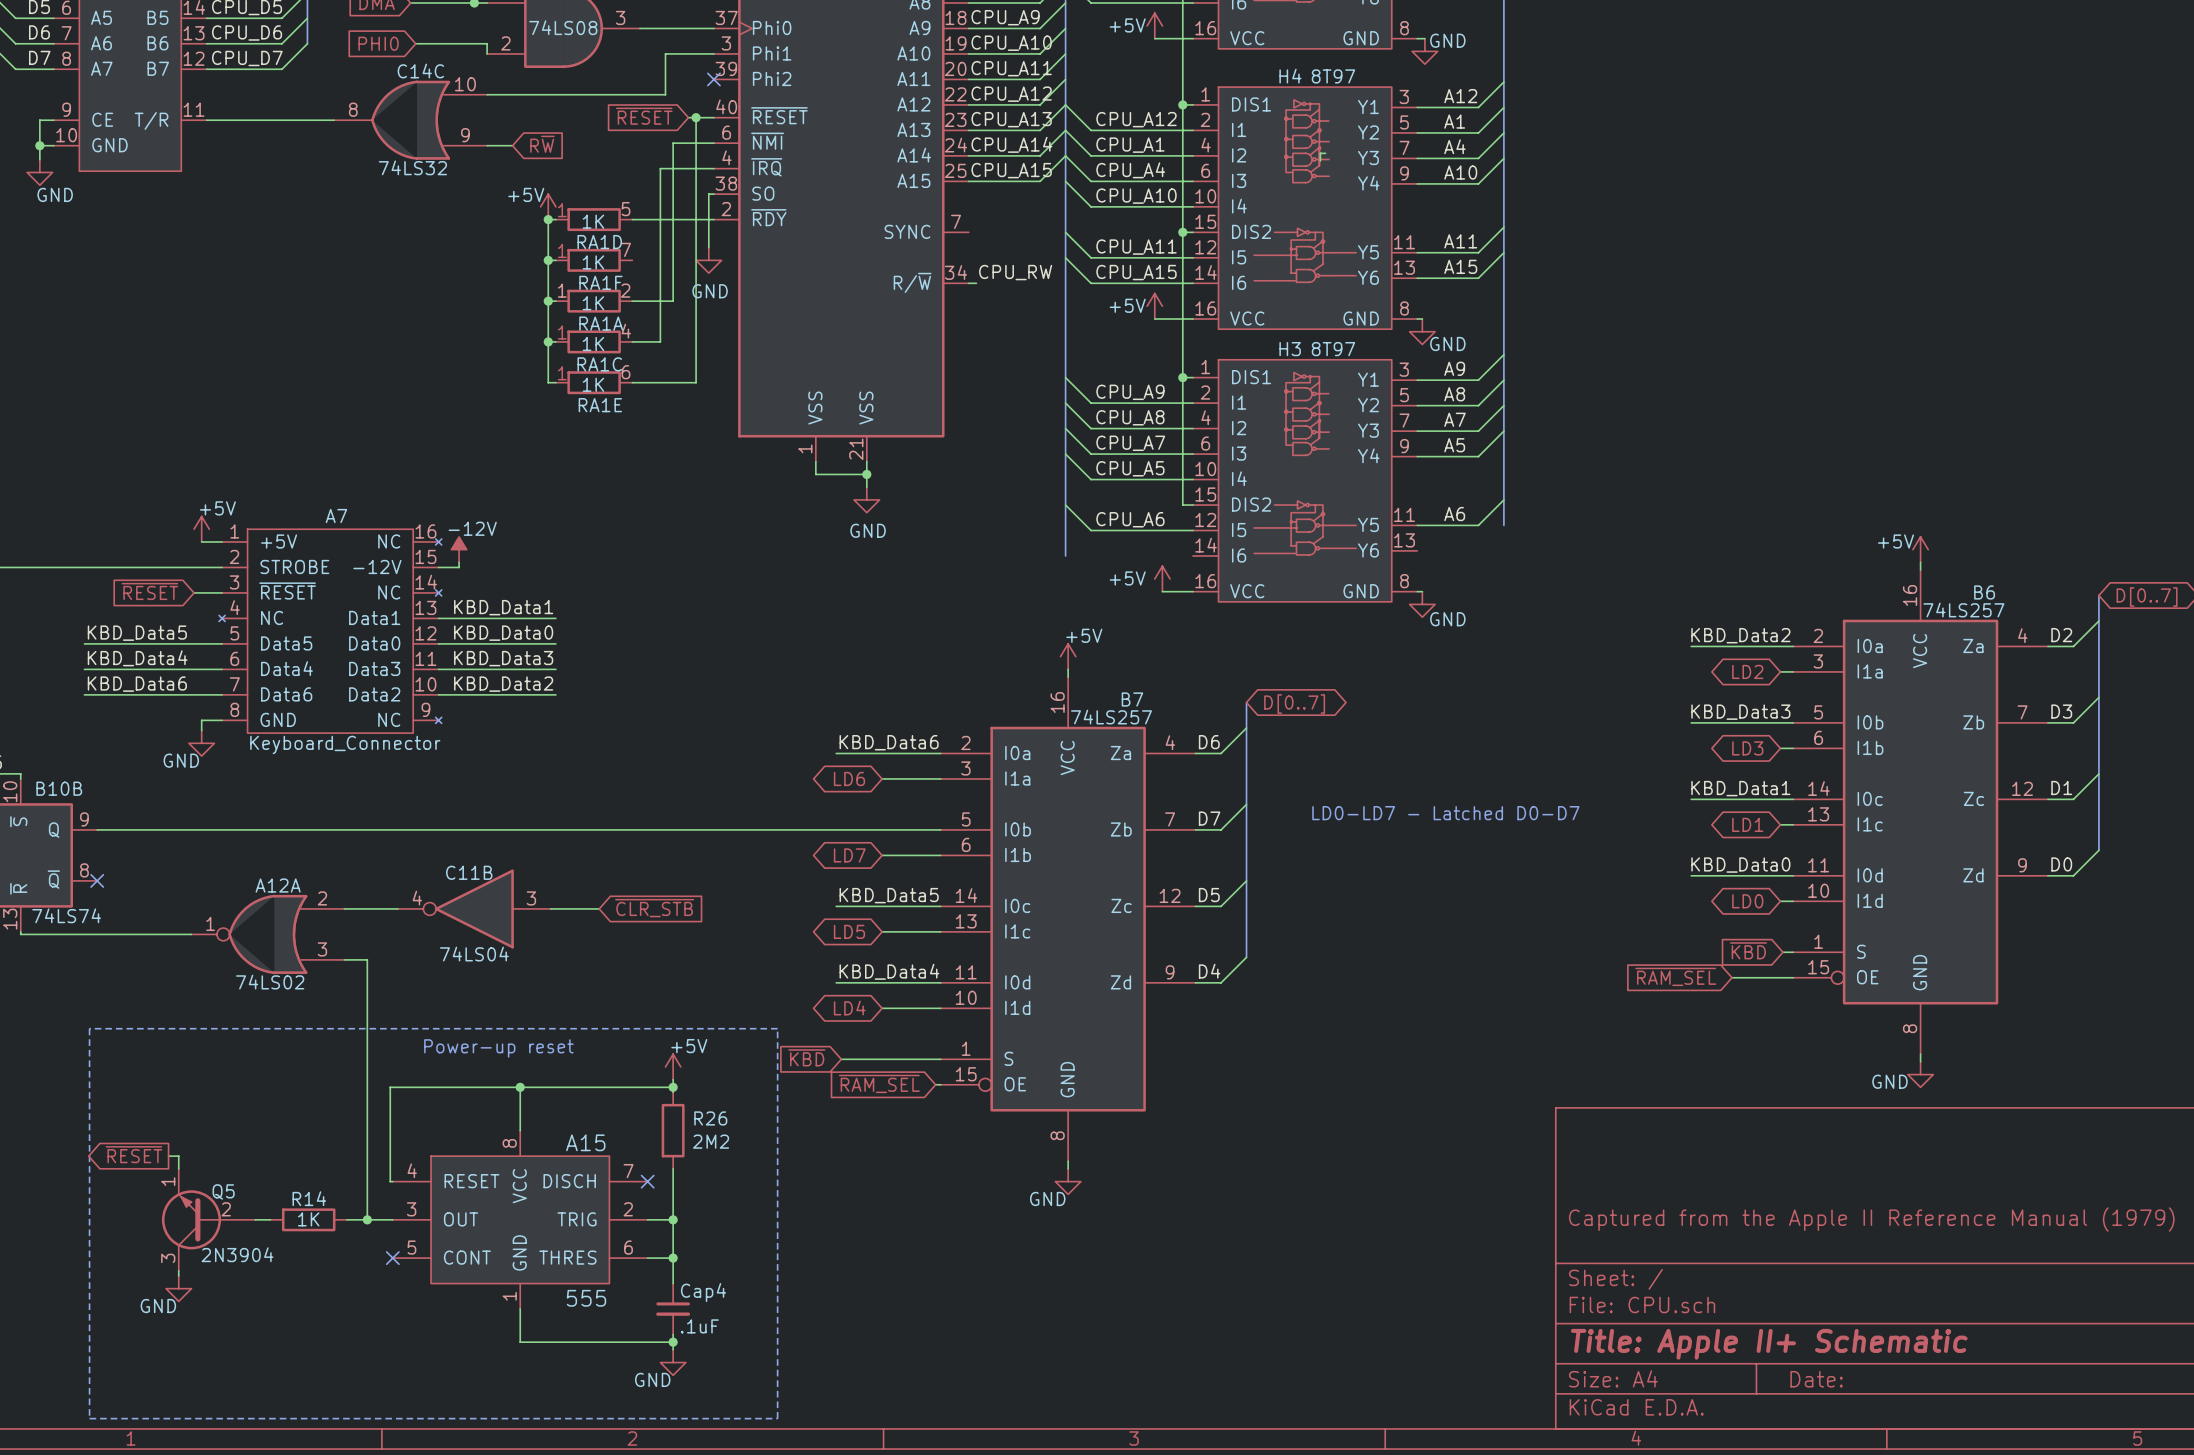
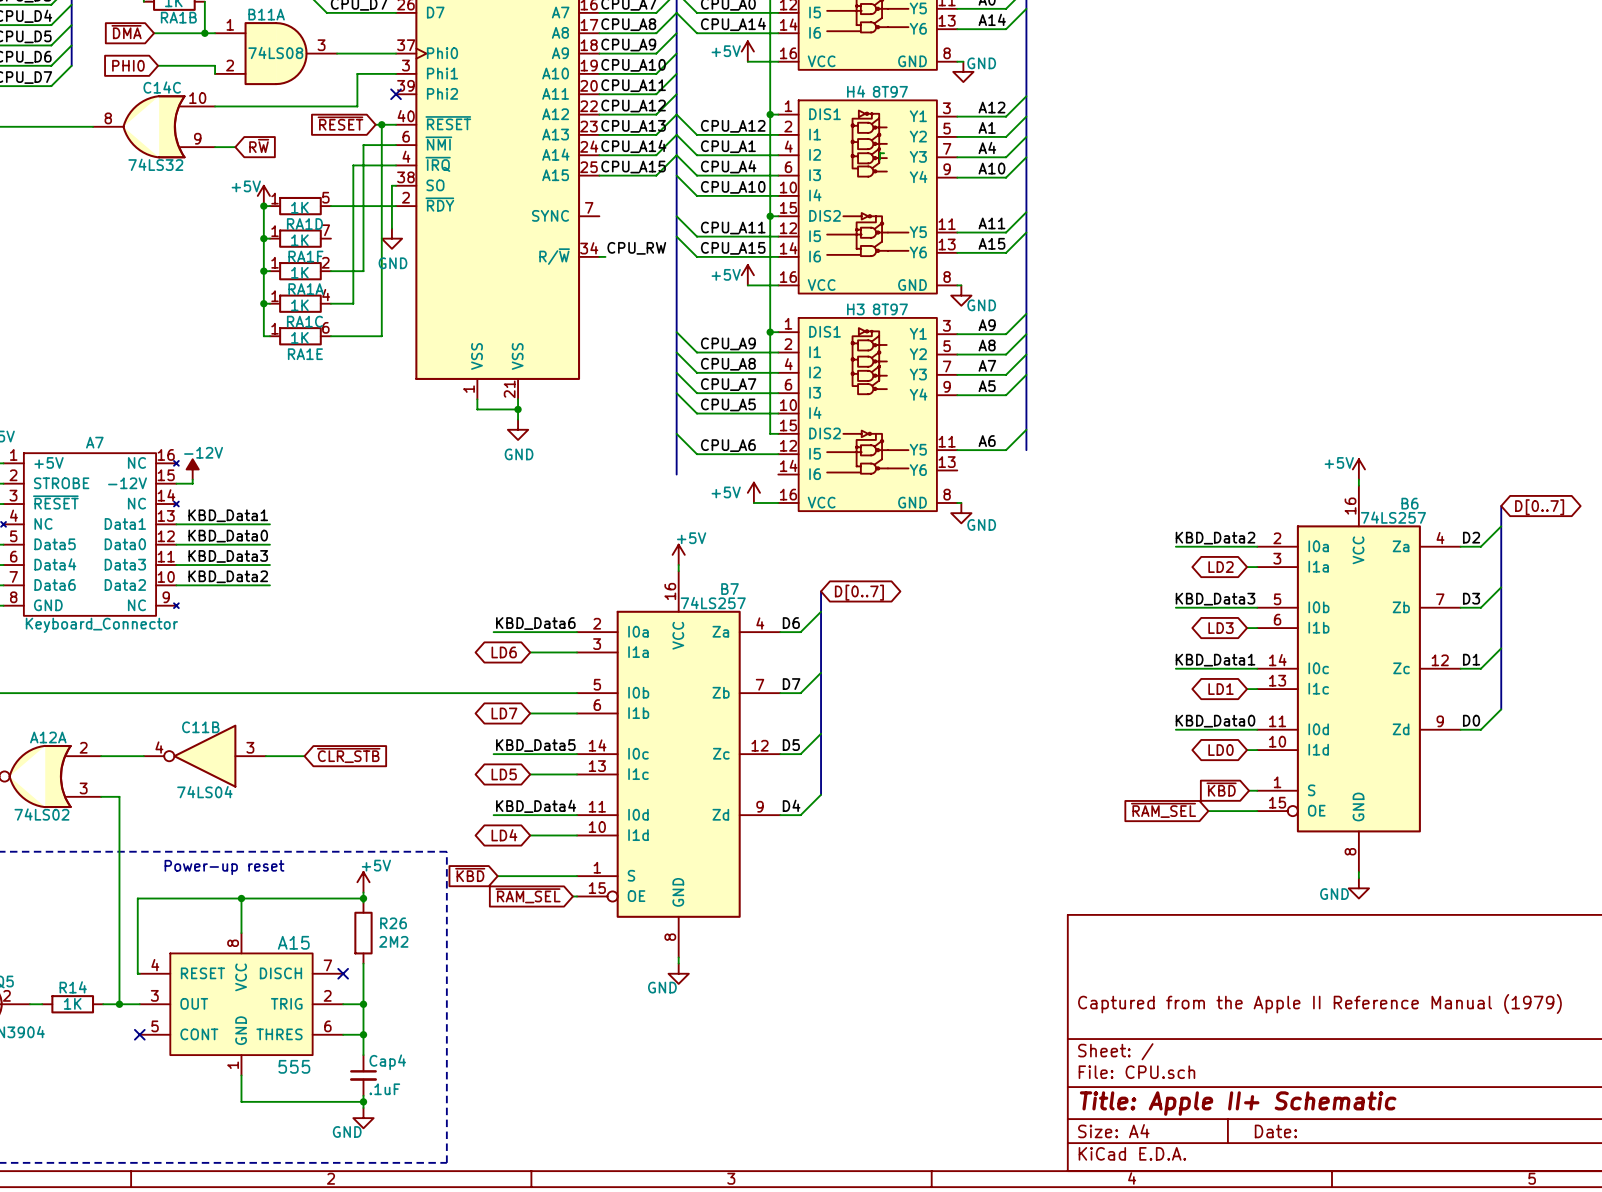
text: LD0-LD7 - Latched D0-D7 (1445, 813) -> none

